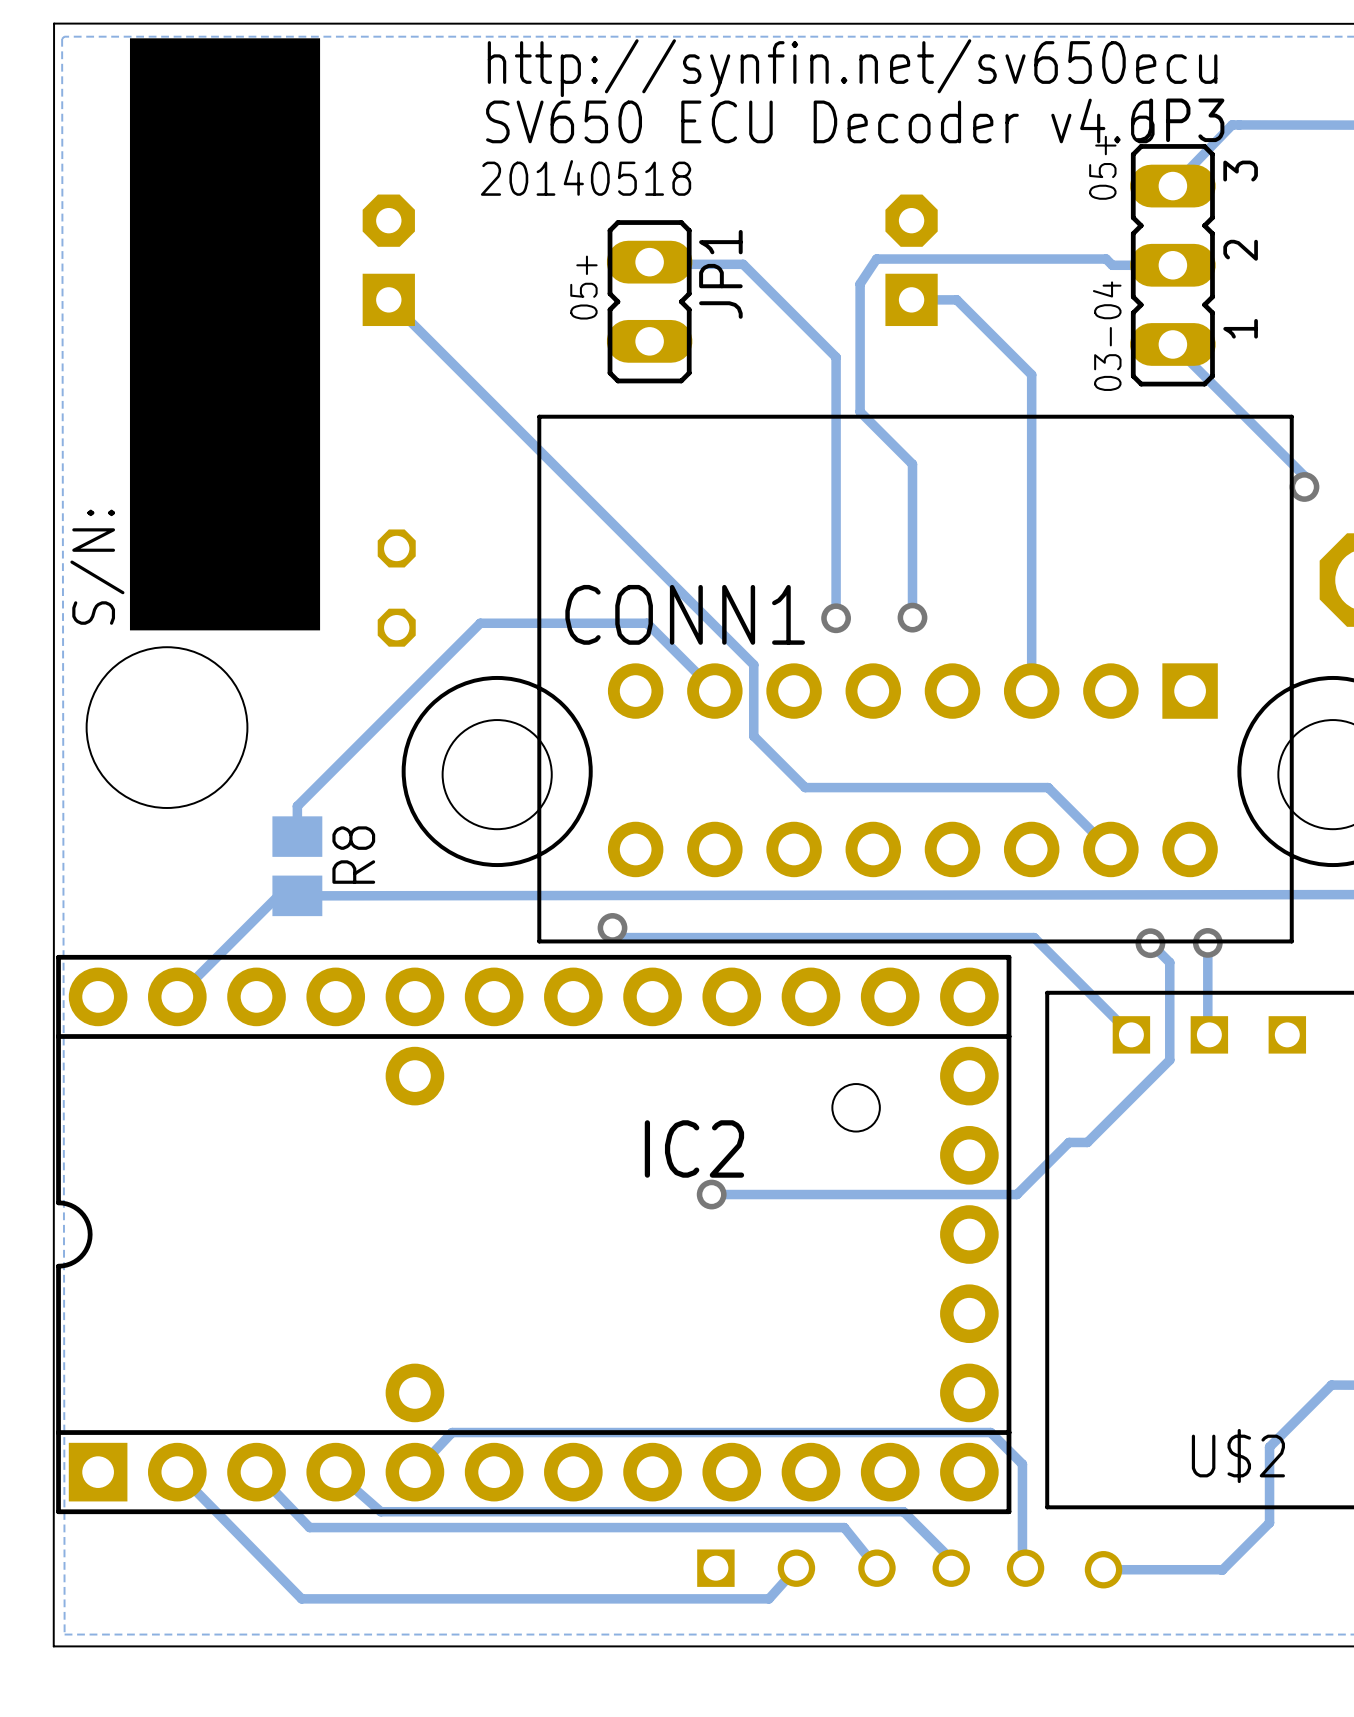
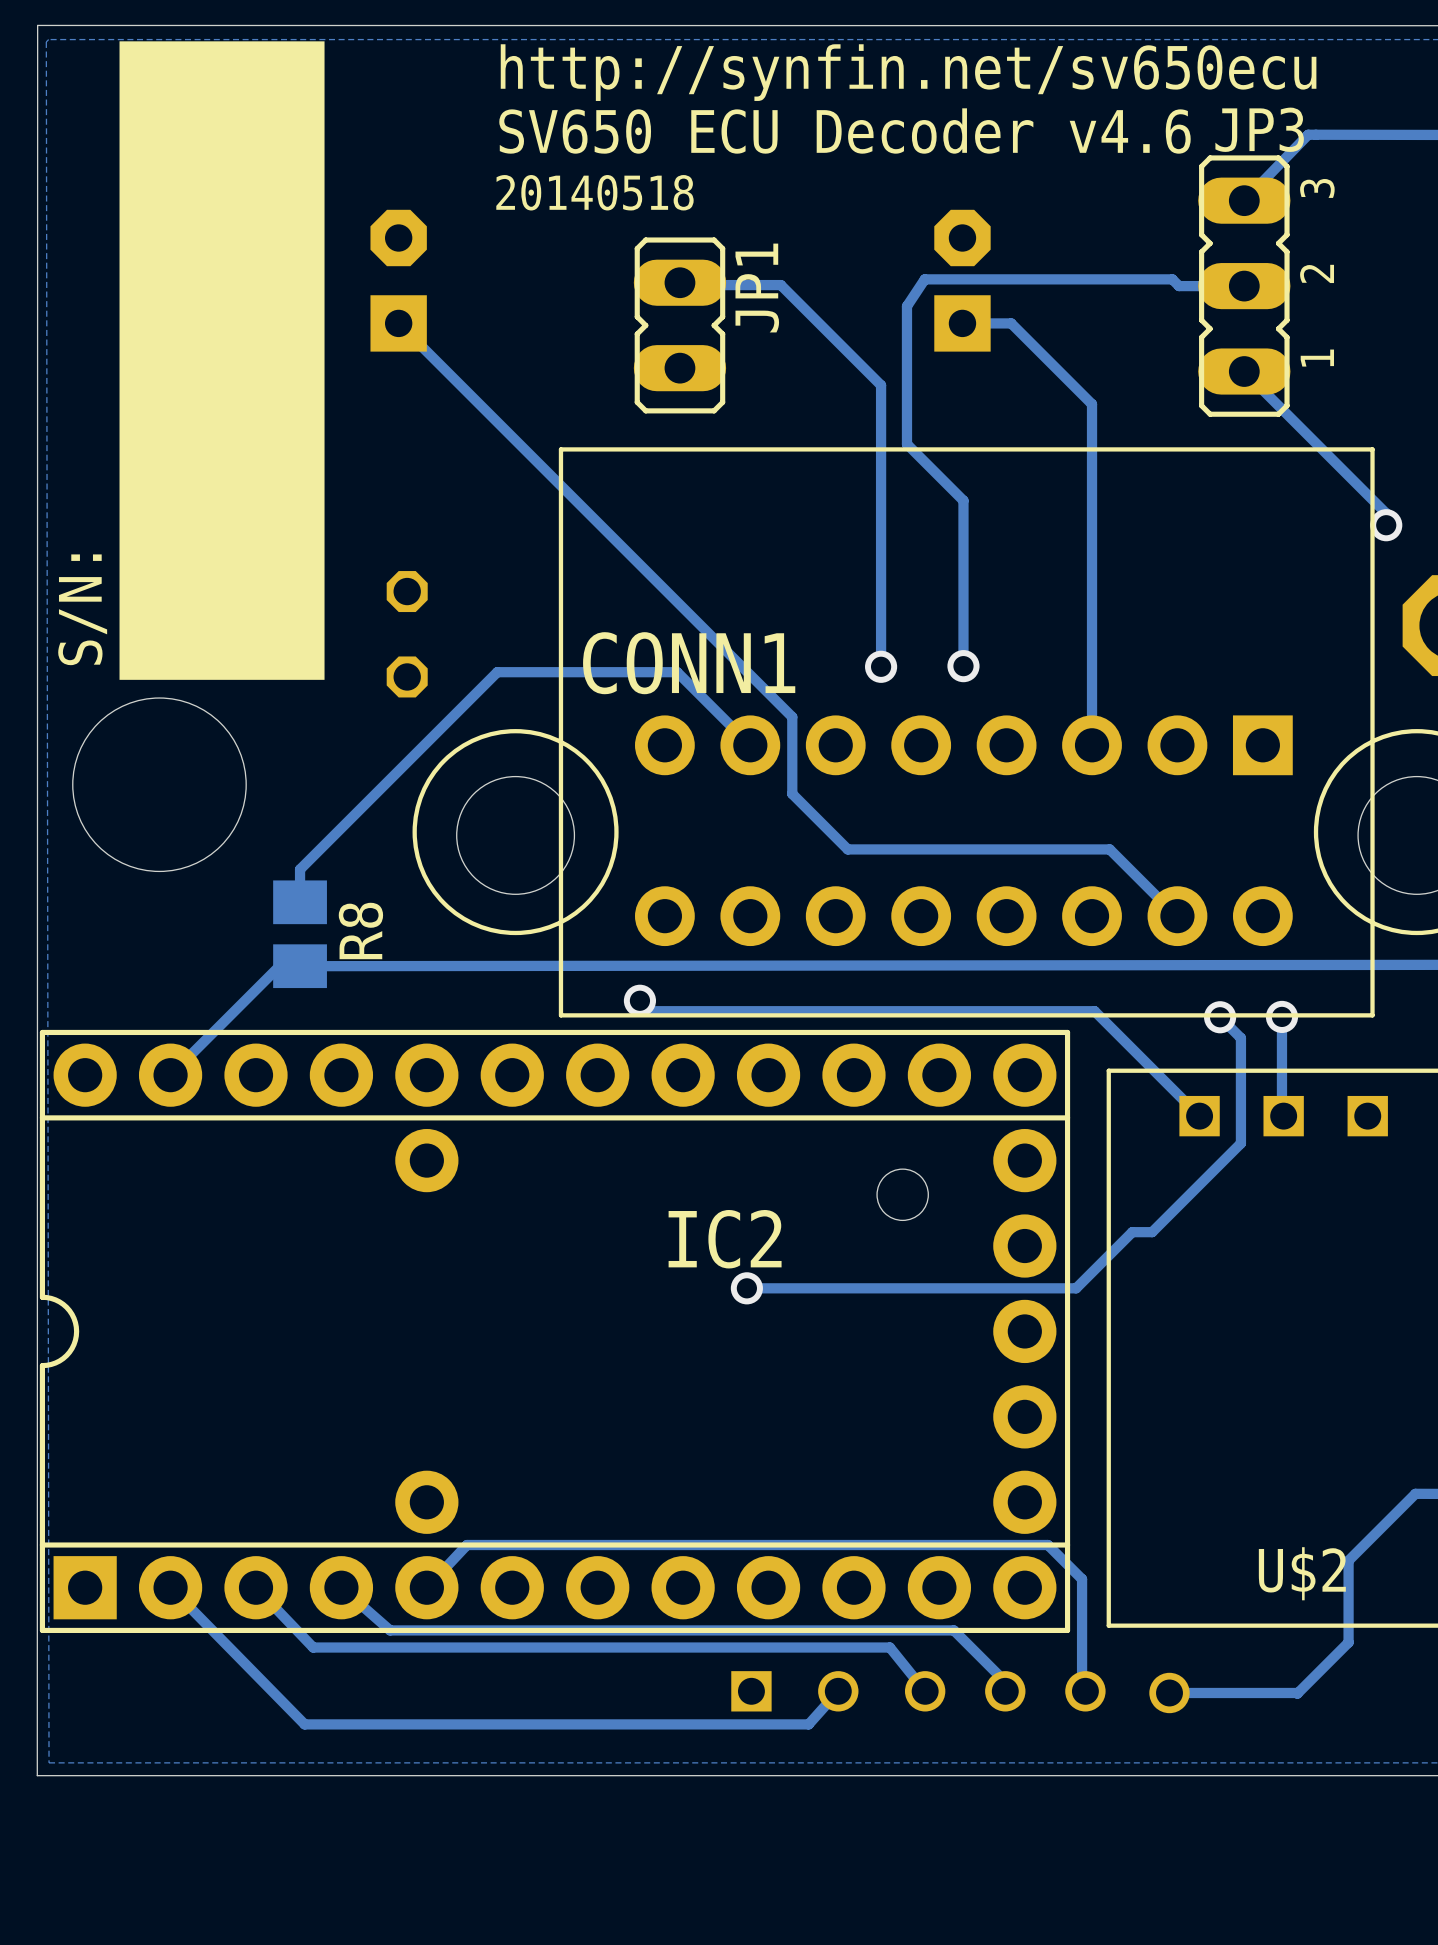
text: 05+ (1102, 167) -> none
text: 05+ (583, 287) -> none
text: 03-04 (1107, 336) -> none

